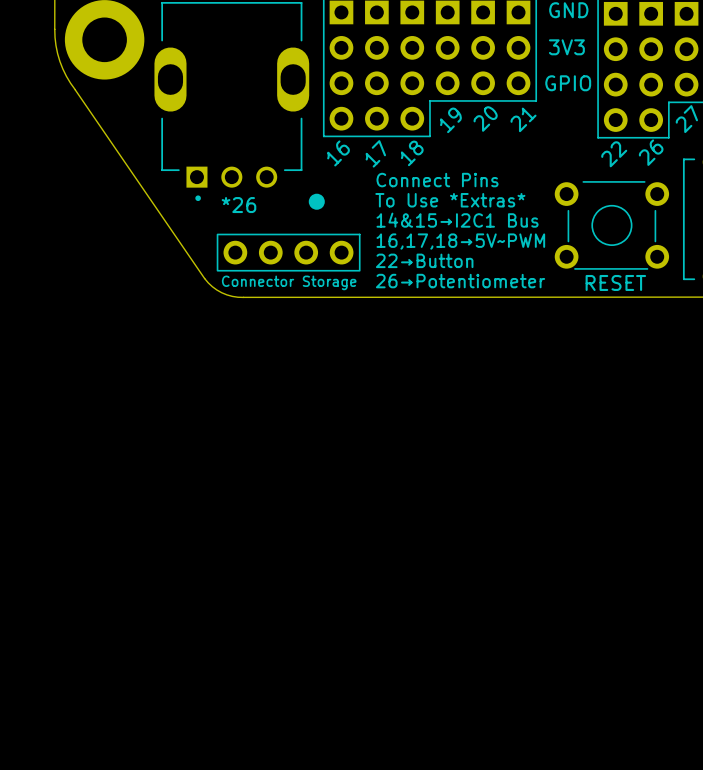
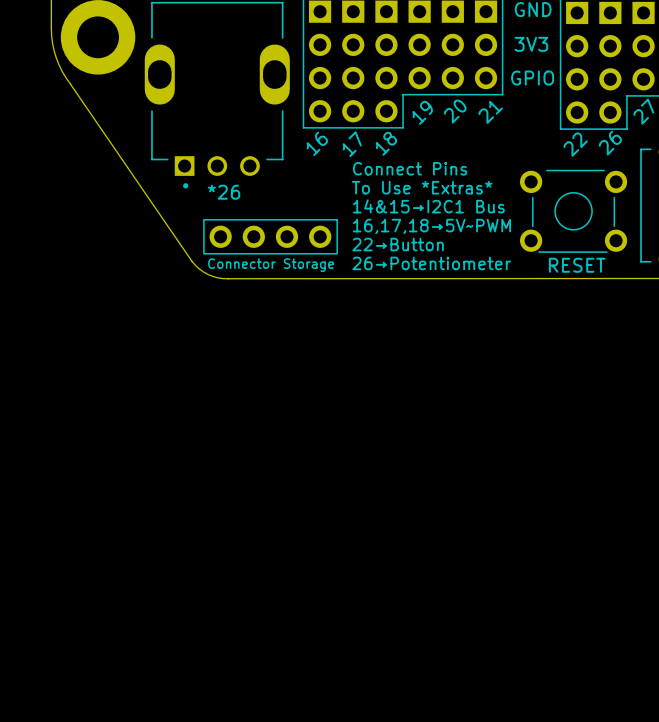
drawing: [308, 193, 325, 210] -> none

